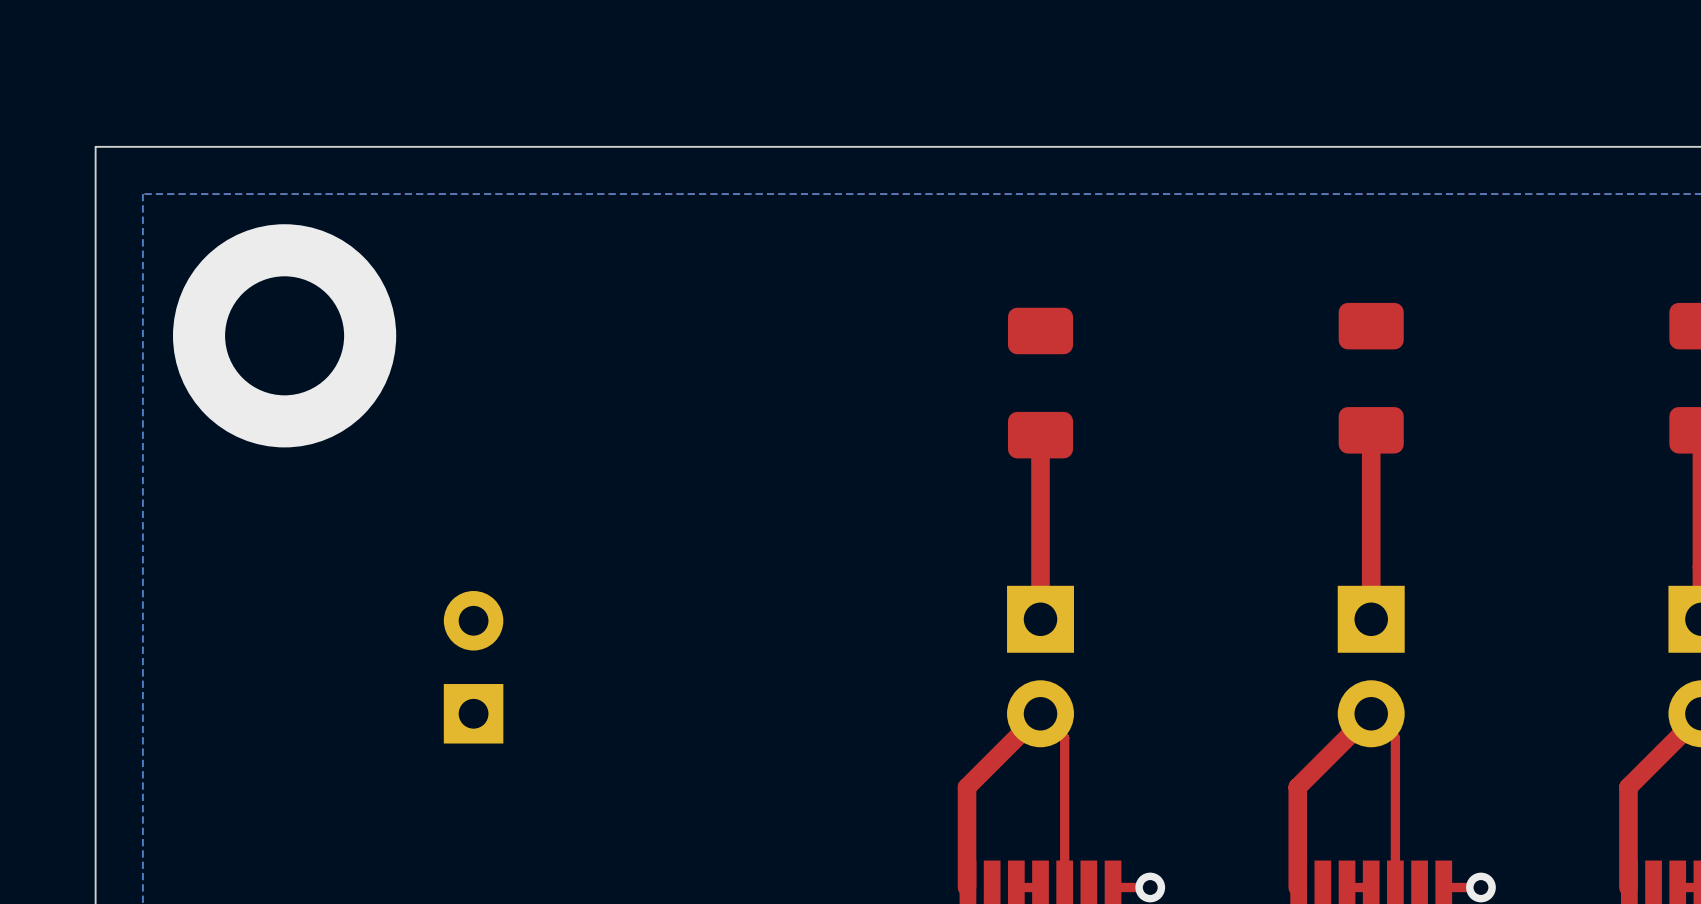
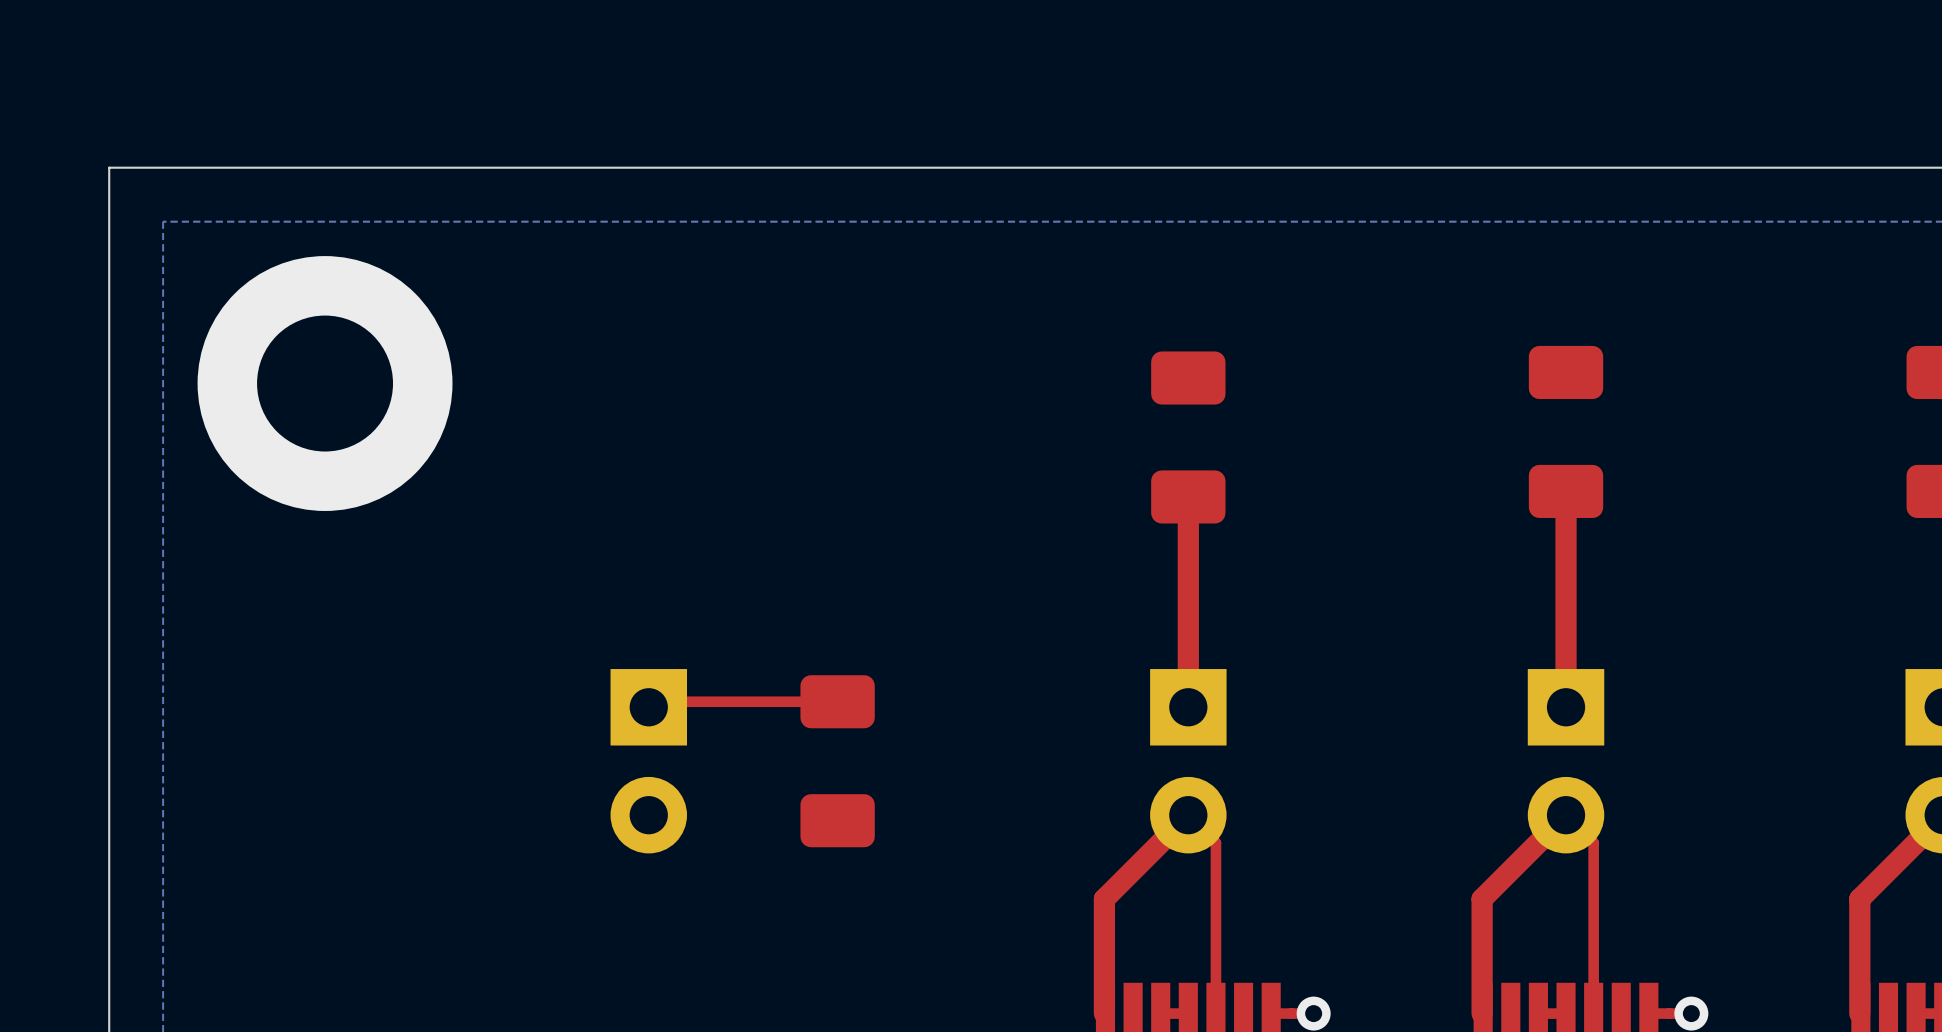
top track: none -> (837, 701) (654, 701) (648, 707)
part: none -> (648, 761)
part: none -> (837, 761)
part: (473, 667) -> none

